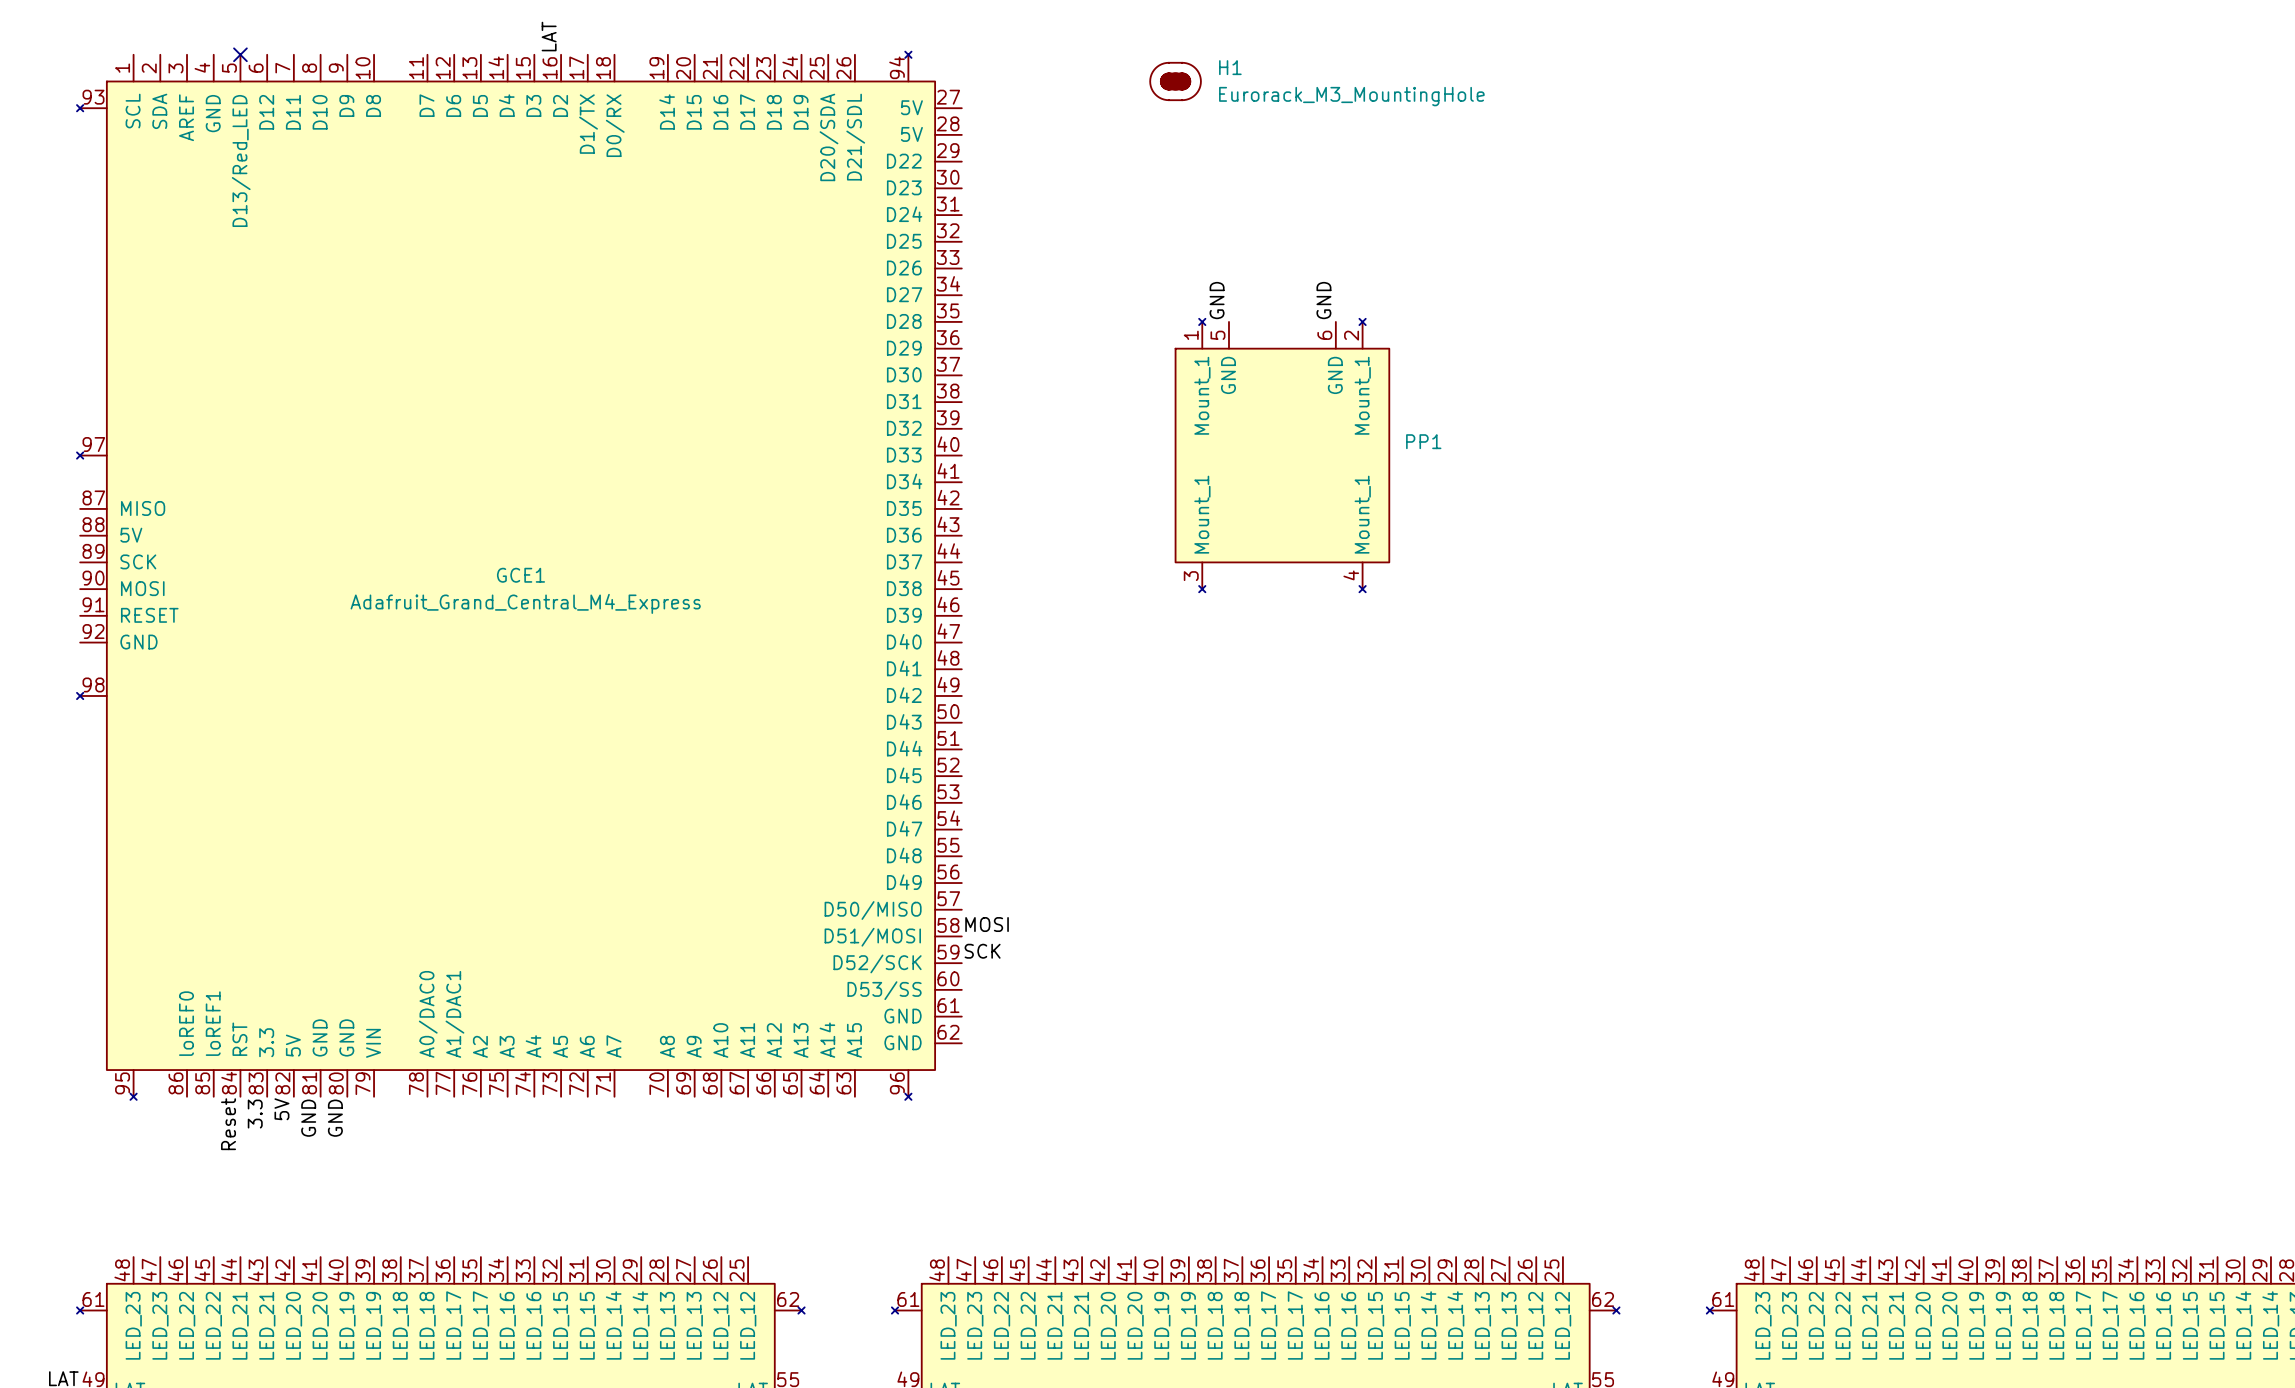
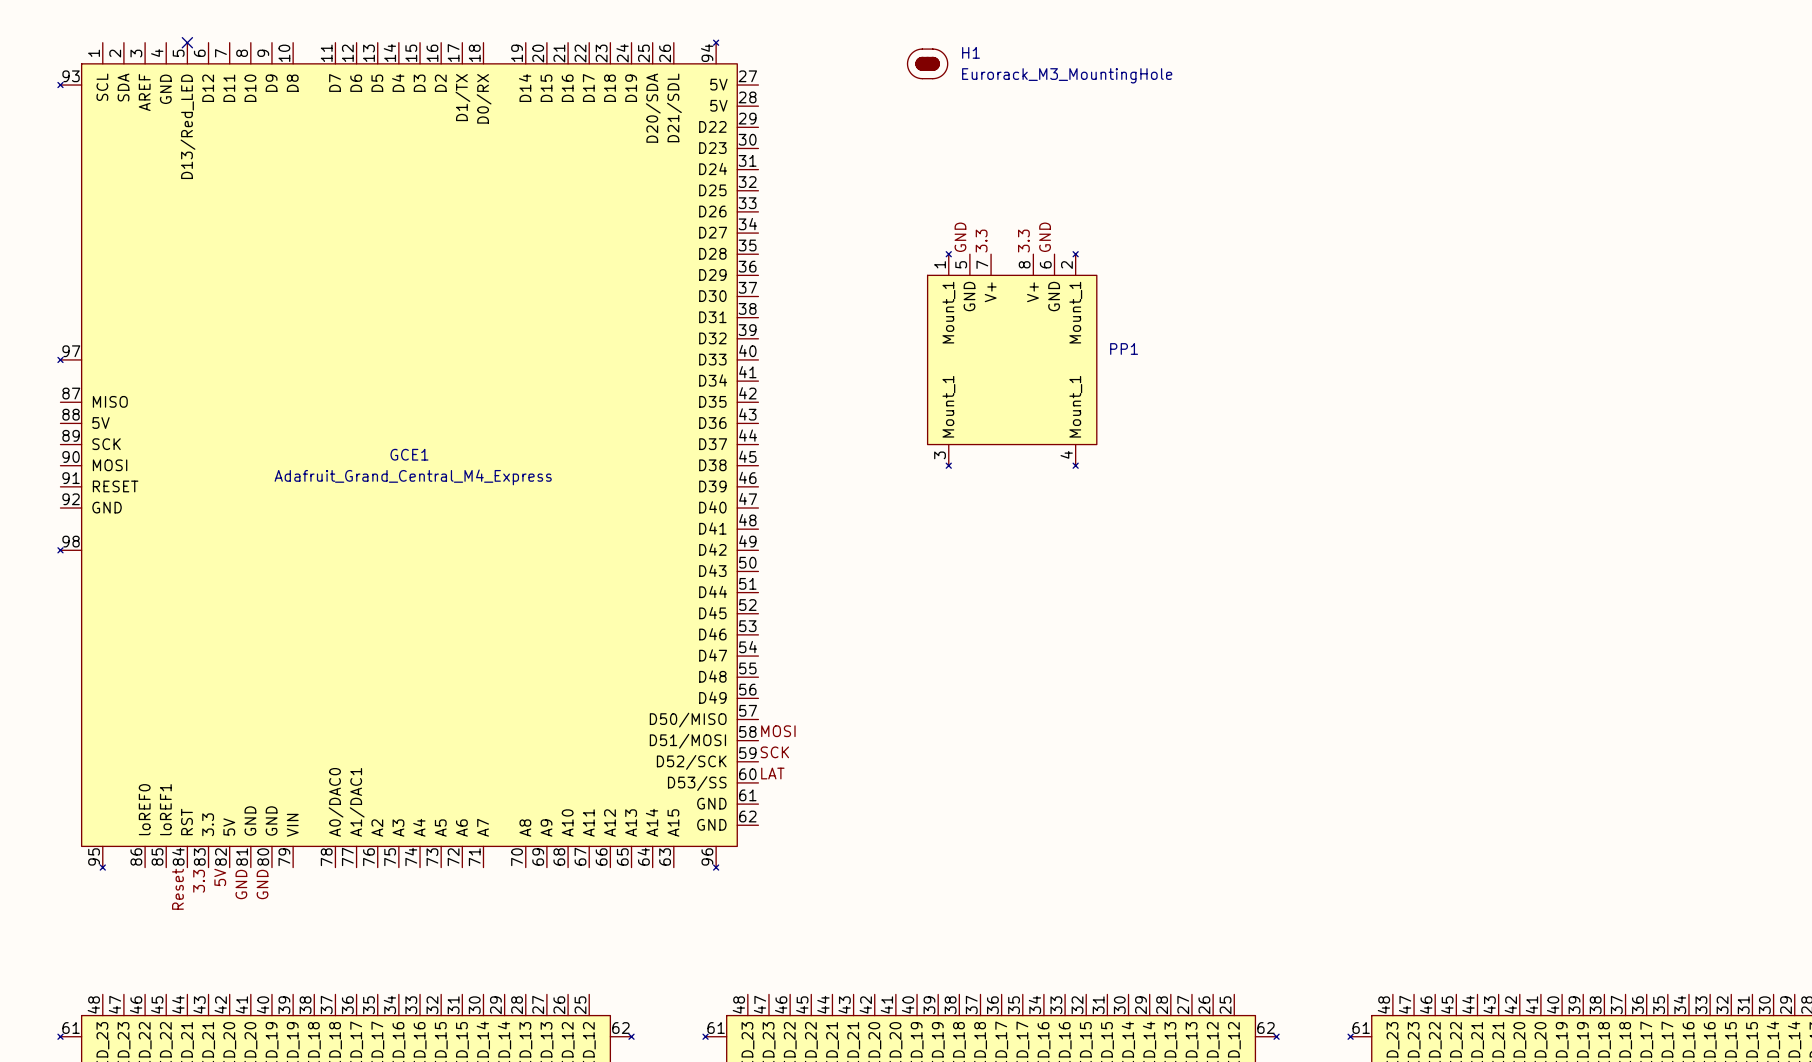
label: LAT (549, 36) -> none
label: none -> 3.3 (981, 241)
label: none -> 3.3 (1023, 241)
PP1 symbol: [1175, 318, 1390, 593] -> [927, 251, 1097, 469]
label: none -> LAT (772, 773)

